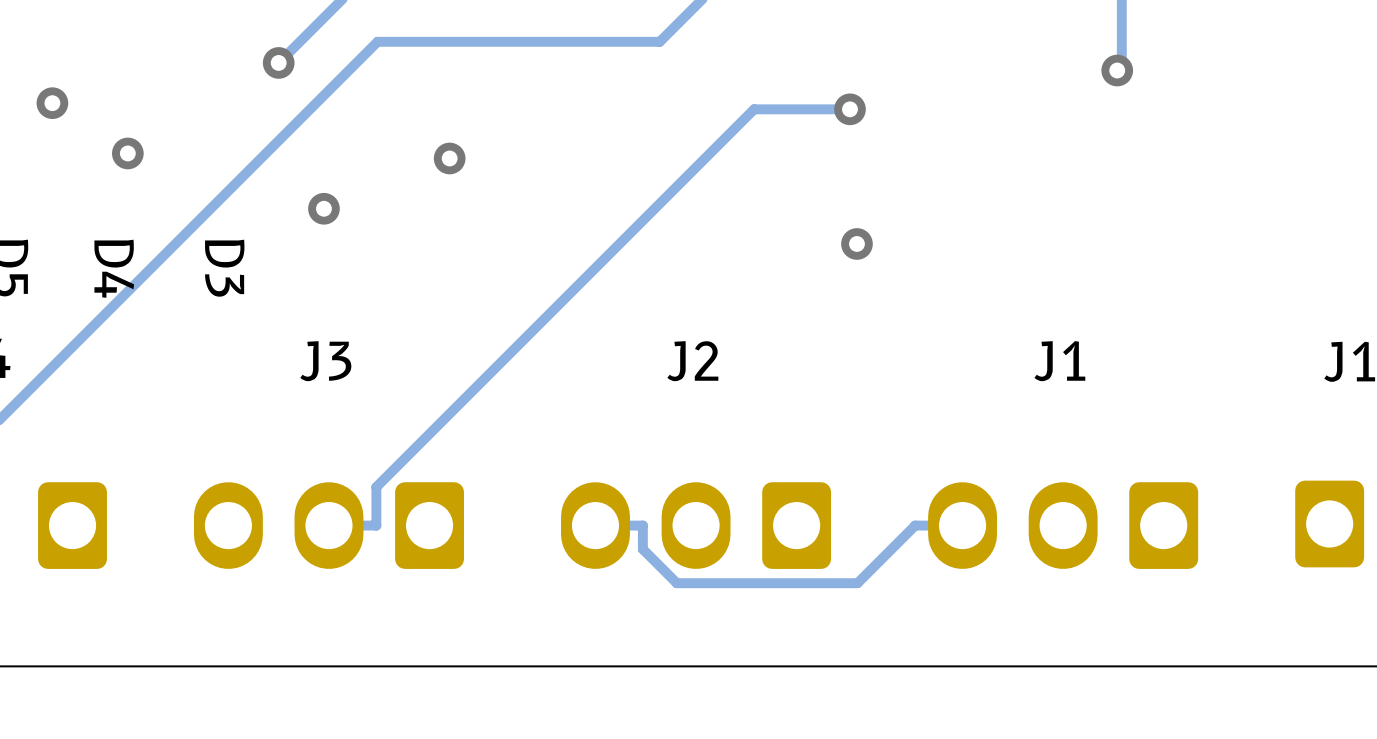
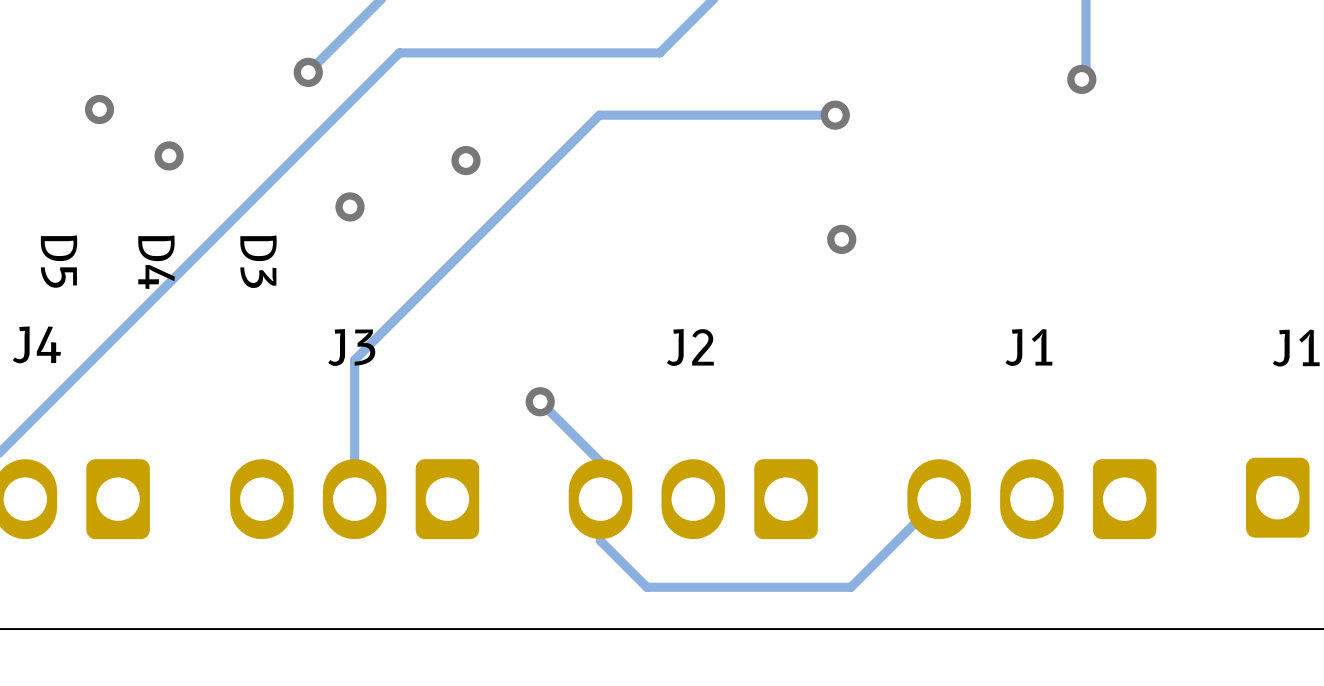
track: (754, 109) (376, 487) (376, 525) (328, 525) -> (746, 115) (599, 115) (354, 360) (354, 499)
via: none -> (540, 401)
track: (962, 525) (915, 525) (857, 583) (676, 583) (642, 549) (642, 525) (595, 525) -> (939, 499) (851, 587) (646, 587) (600, 540) (600, 462) (540, 401)

